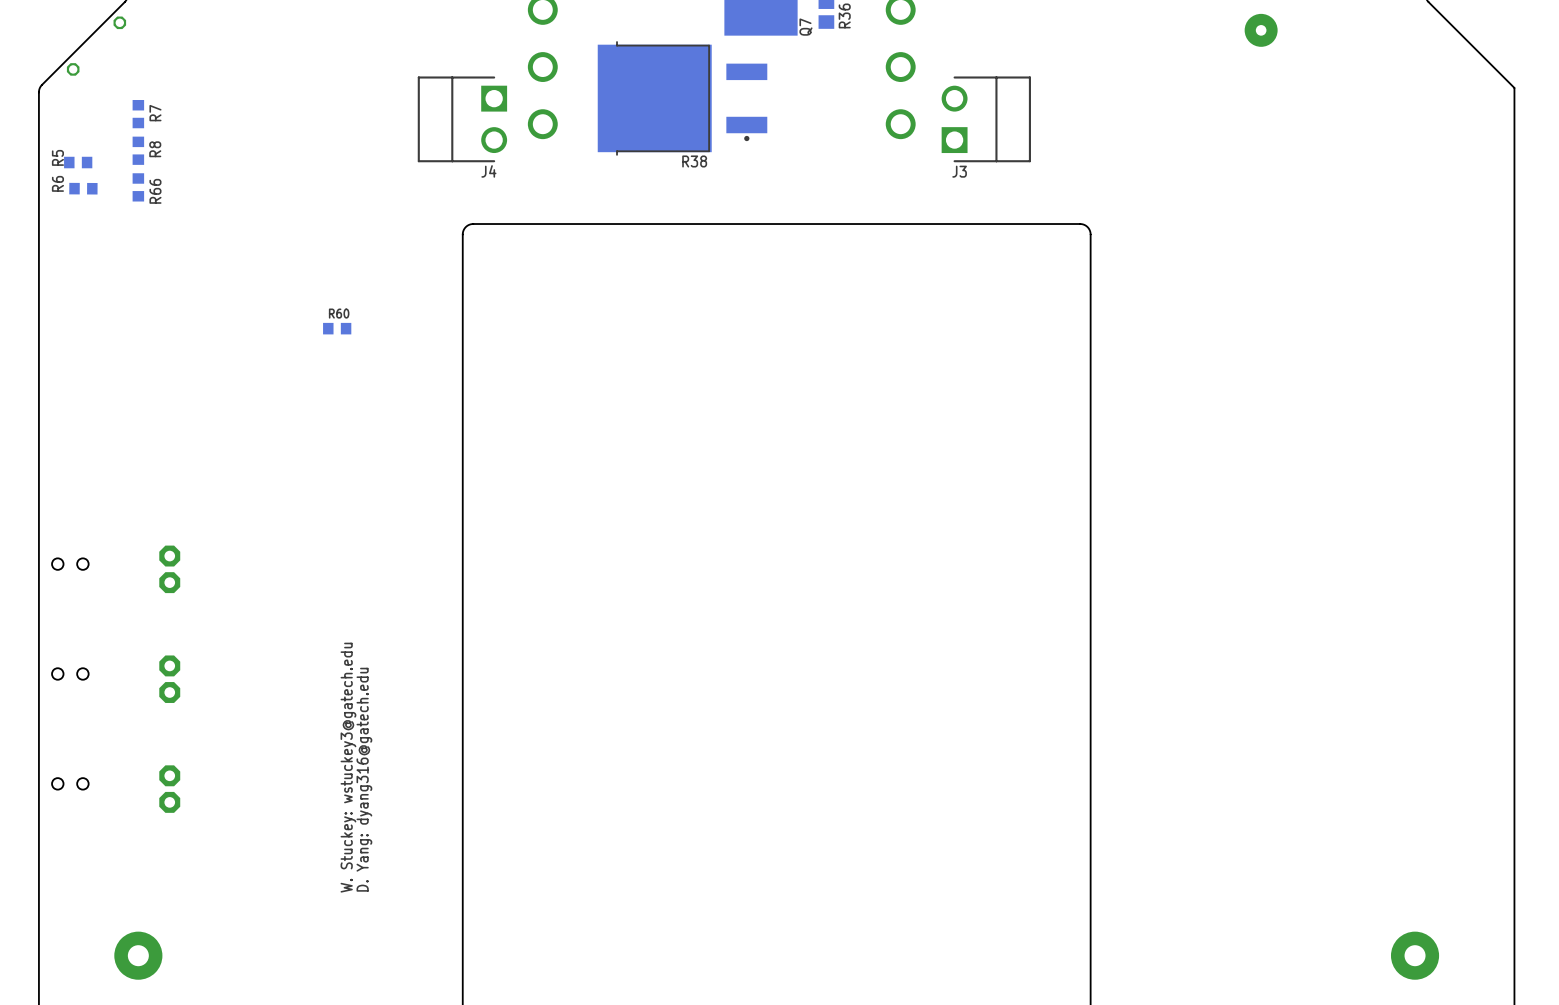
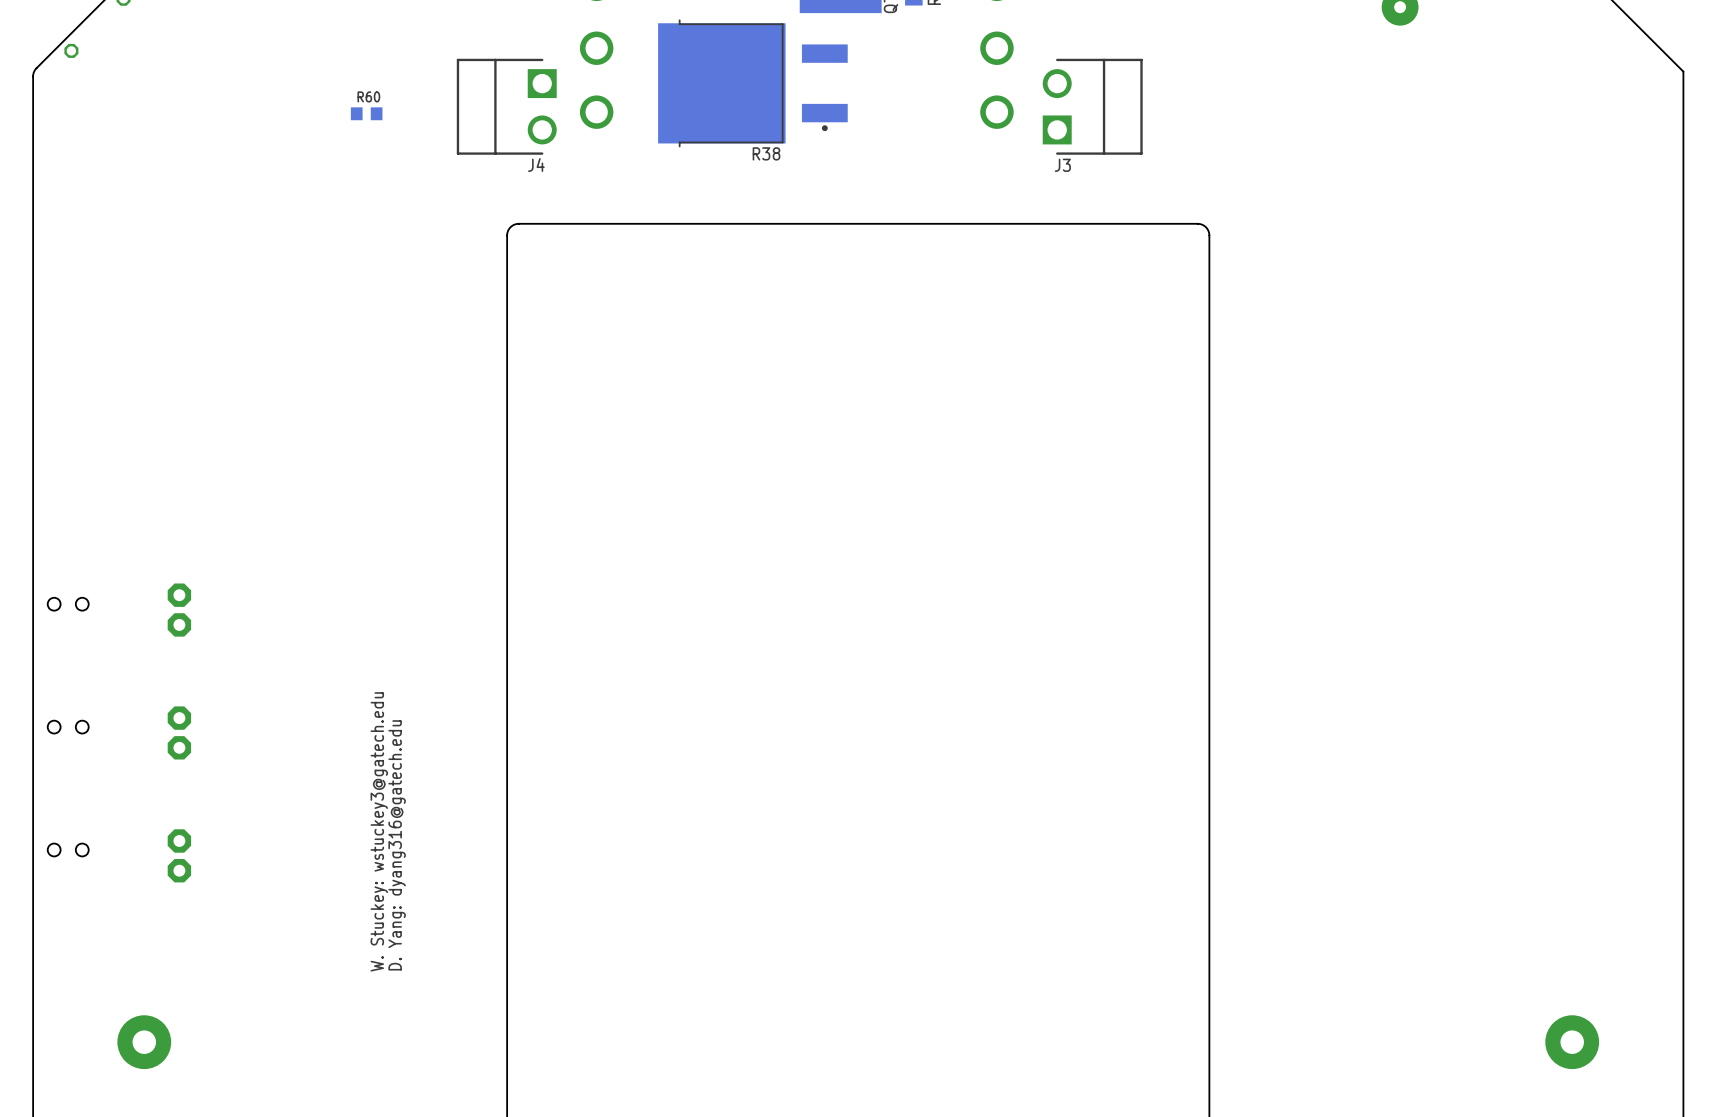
R7: (138, 114) -> none
R8: (138, 150) -> none
R5: (78, 162) -> none
R66: (138, 187) -> none
R6: (83, 188) -> none
R60 position: (337, 328) -> (366, 113)

